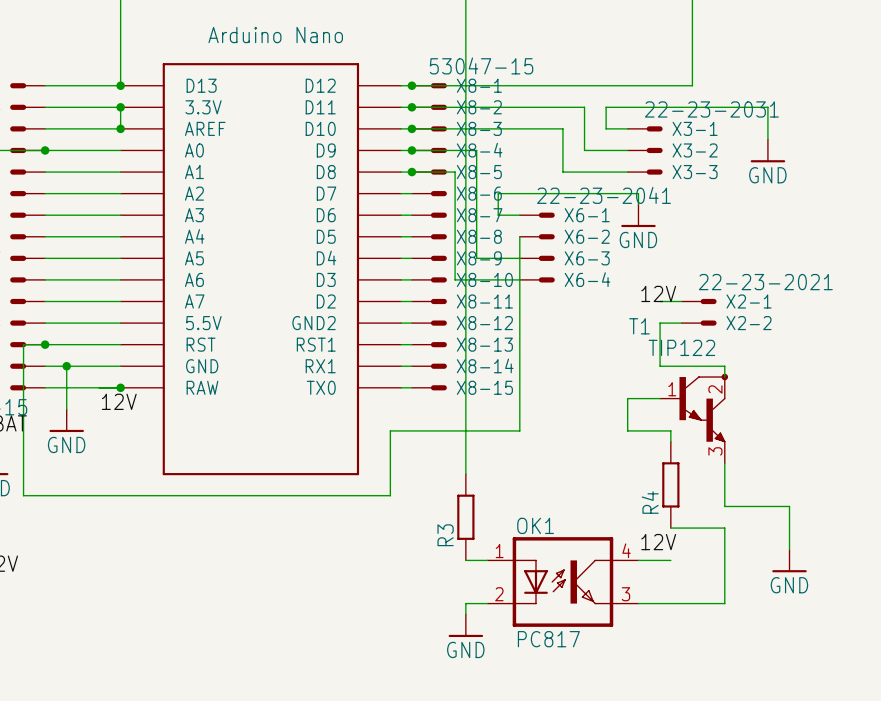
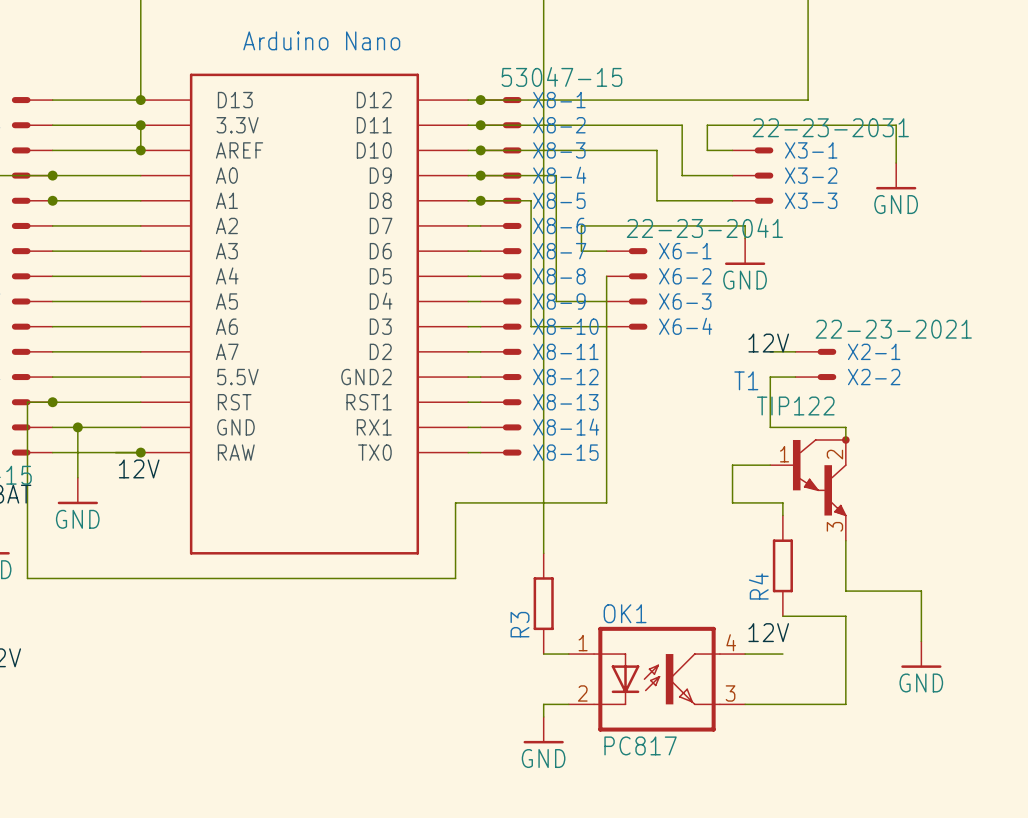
junction: none -> (52, 200)

